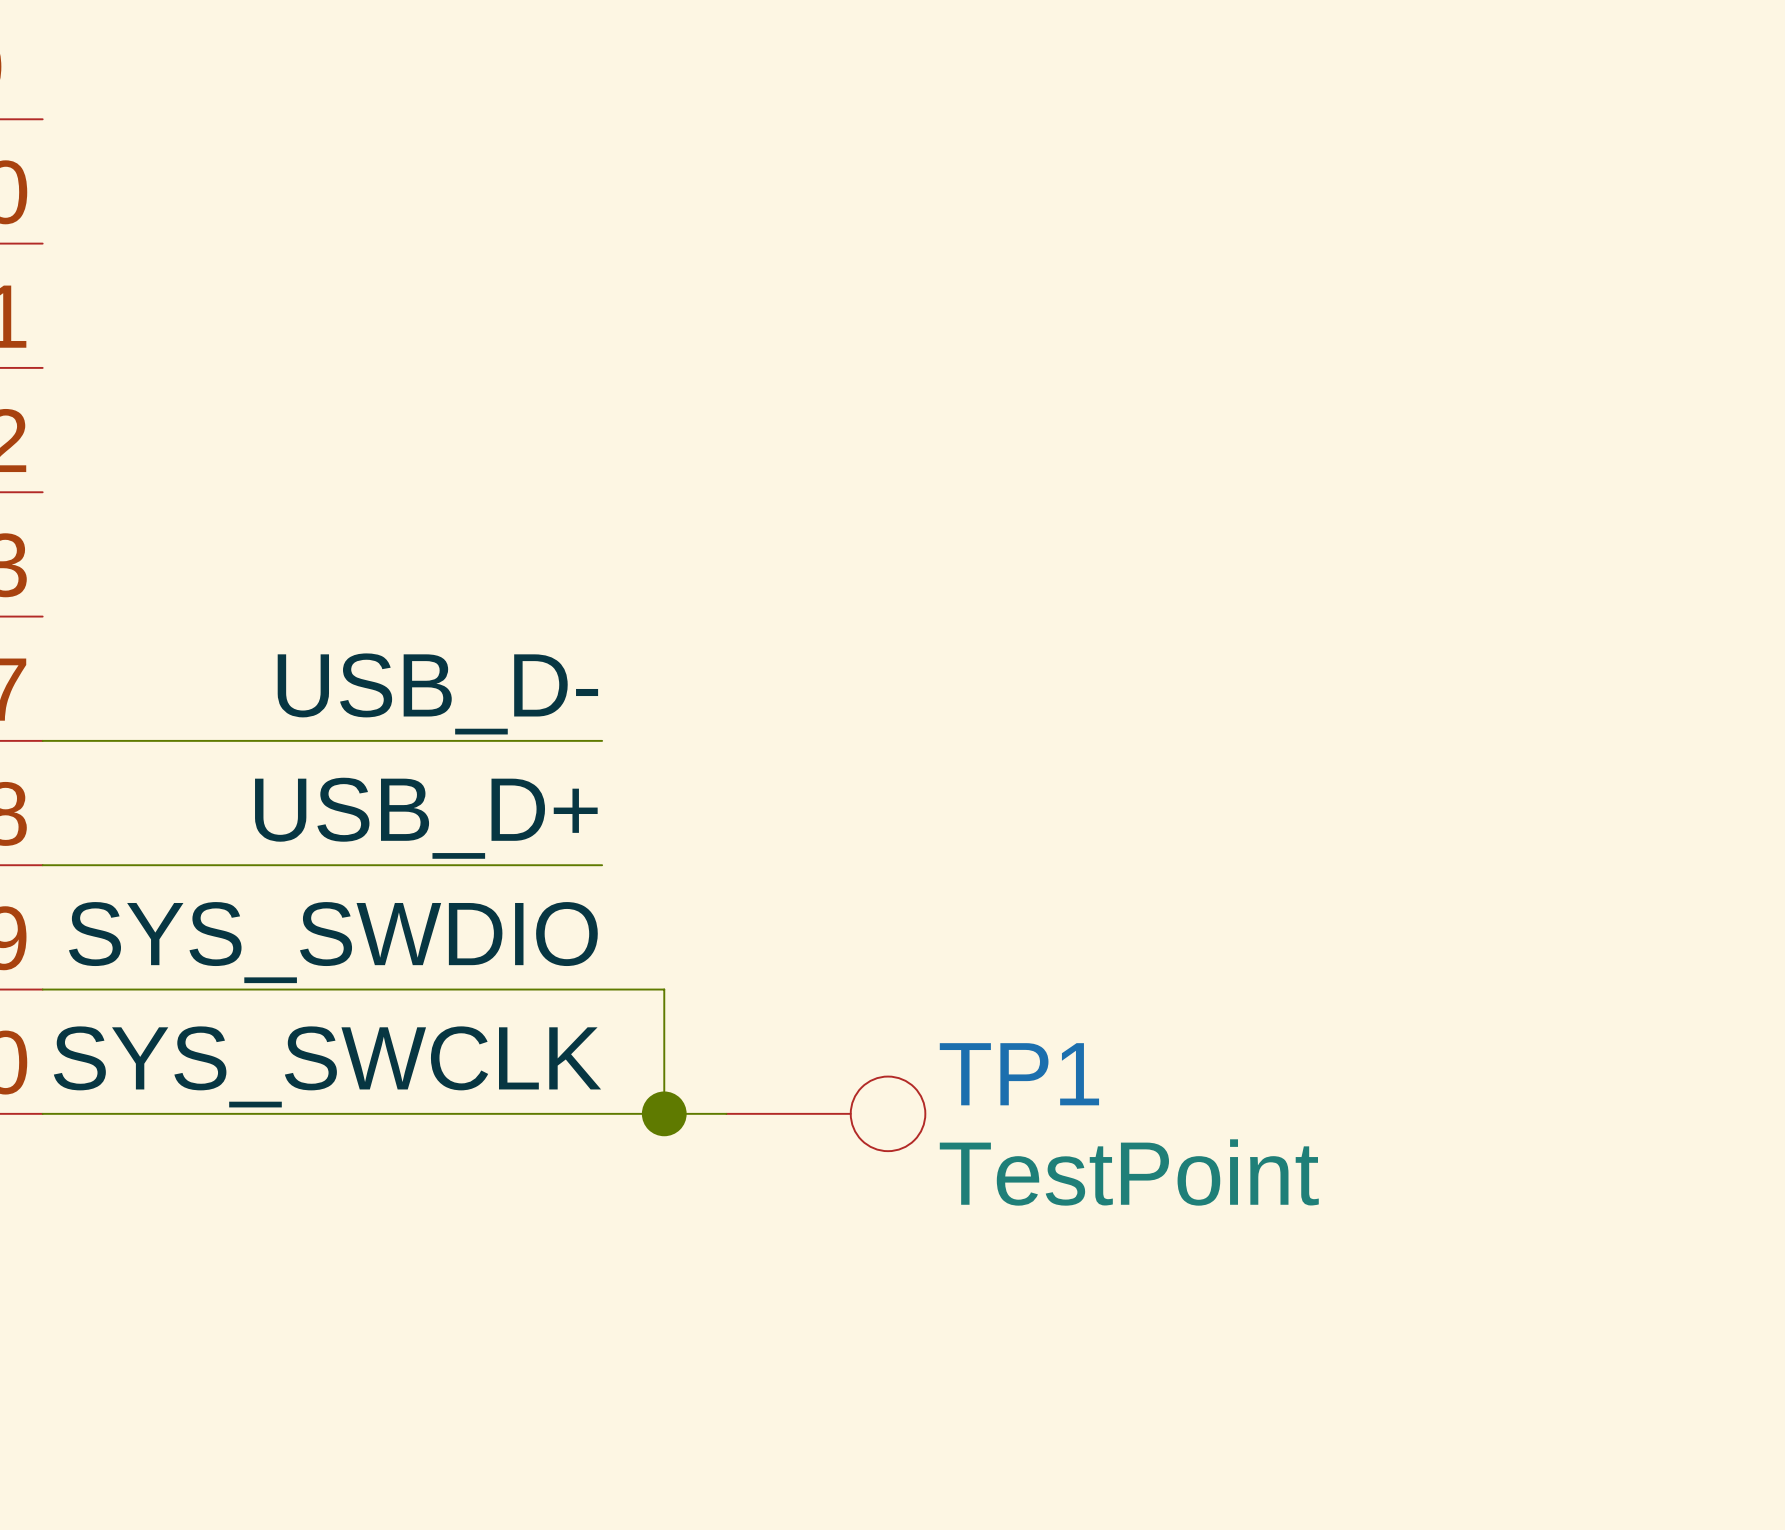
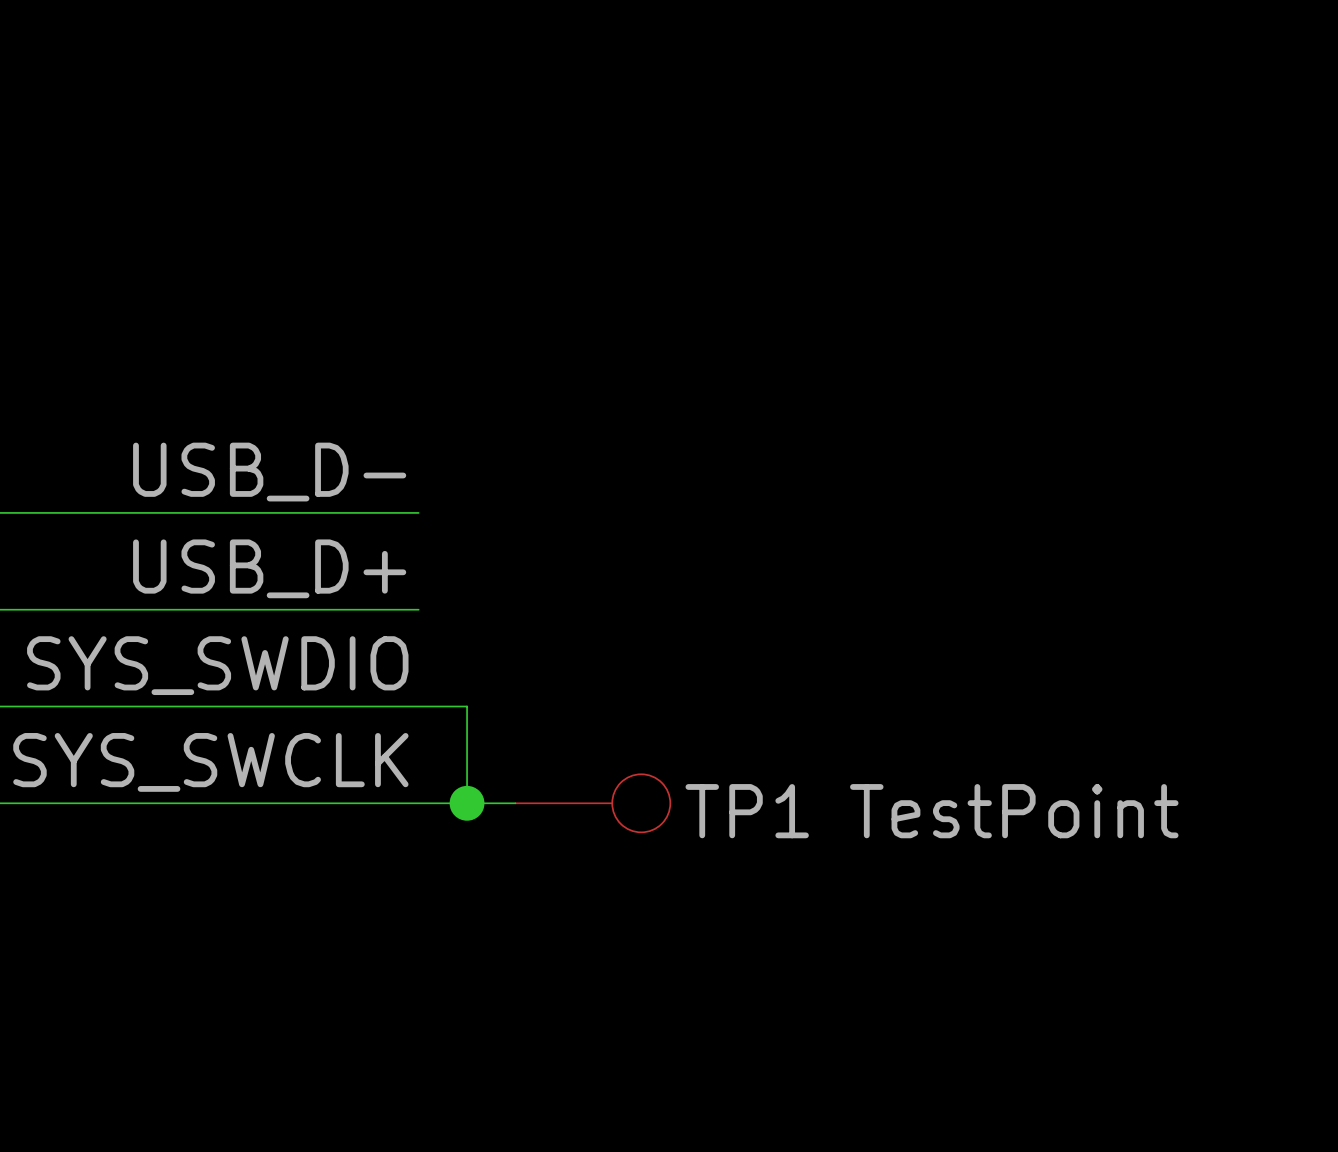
TP1 name position: TP1 (1019, 1074) -> TP1 (747, 811)
TP1 value position: TestPoint (1129, 1172) -> TestPoint (1014, 811)

